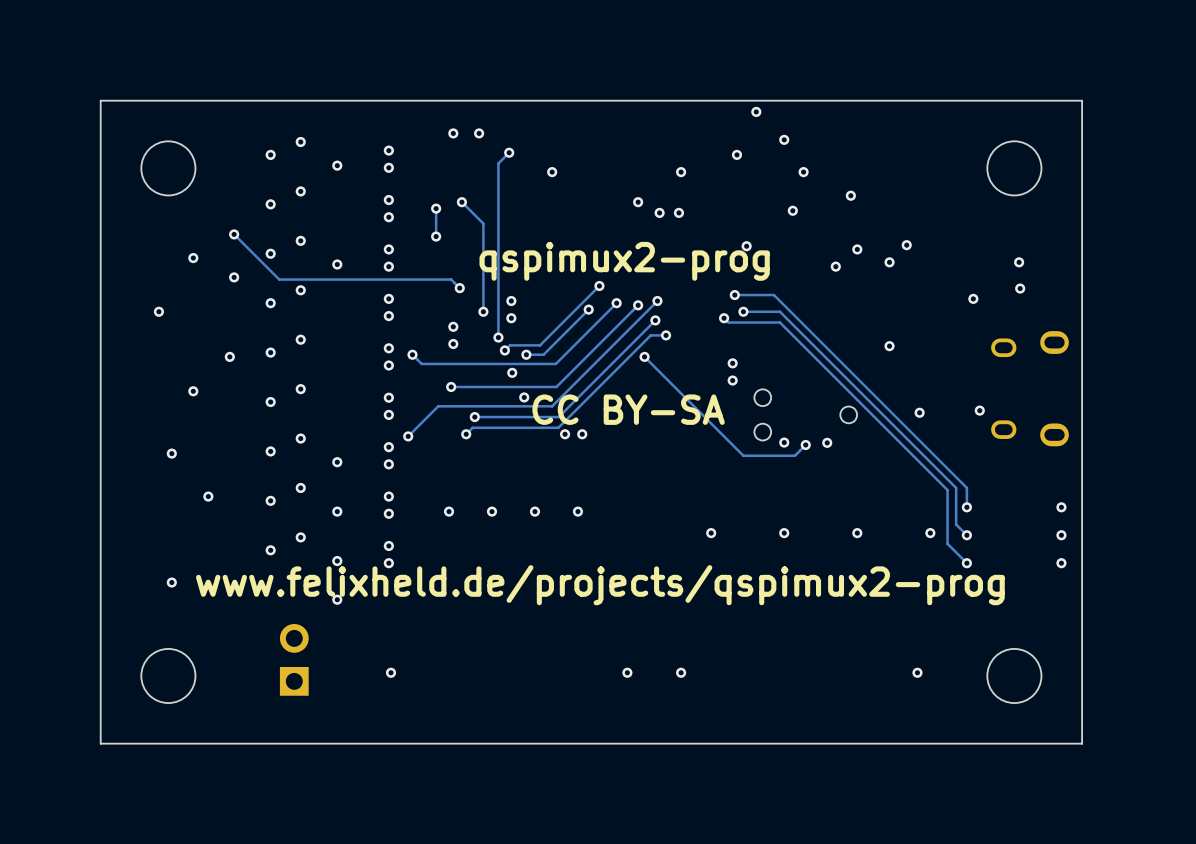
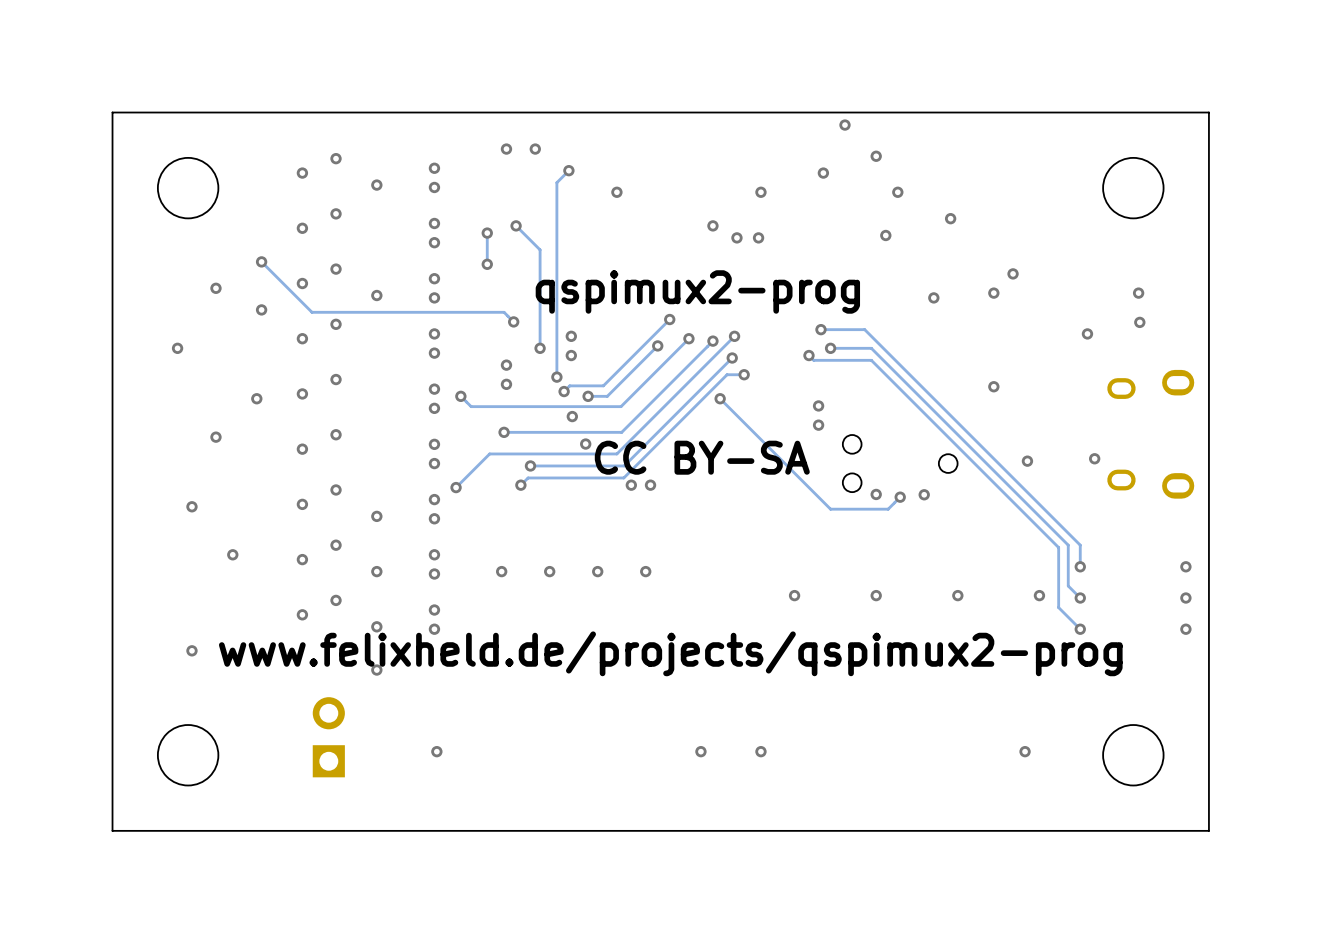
via: (746, 246) -> none
via: (857, 249) -> none

